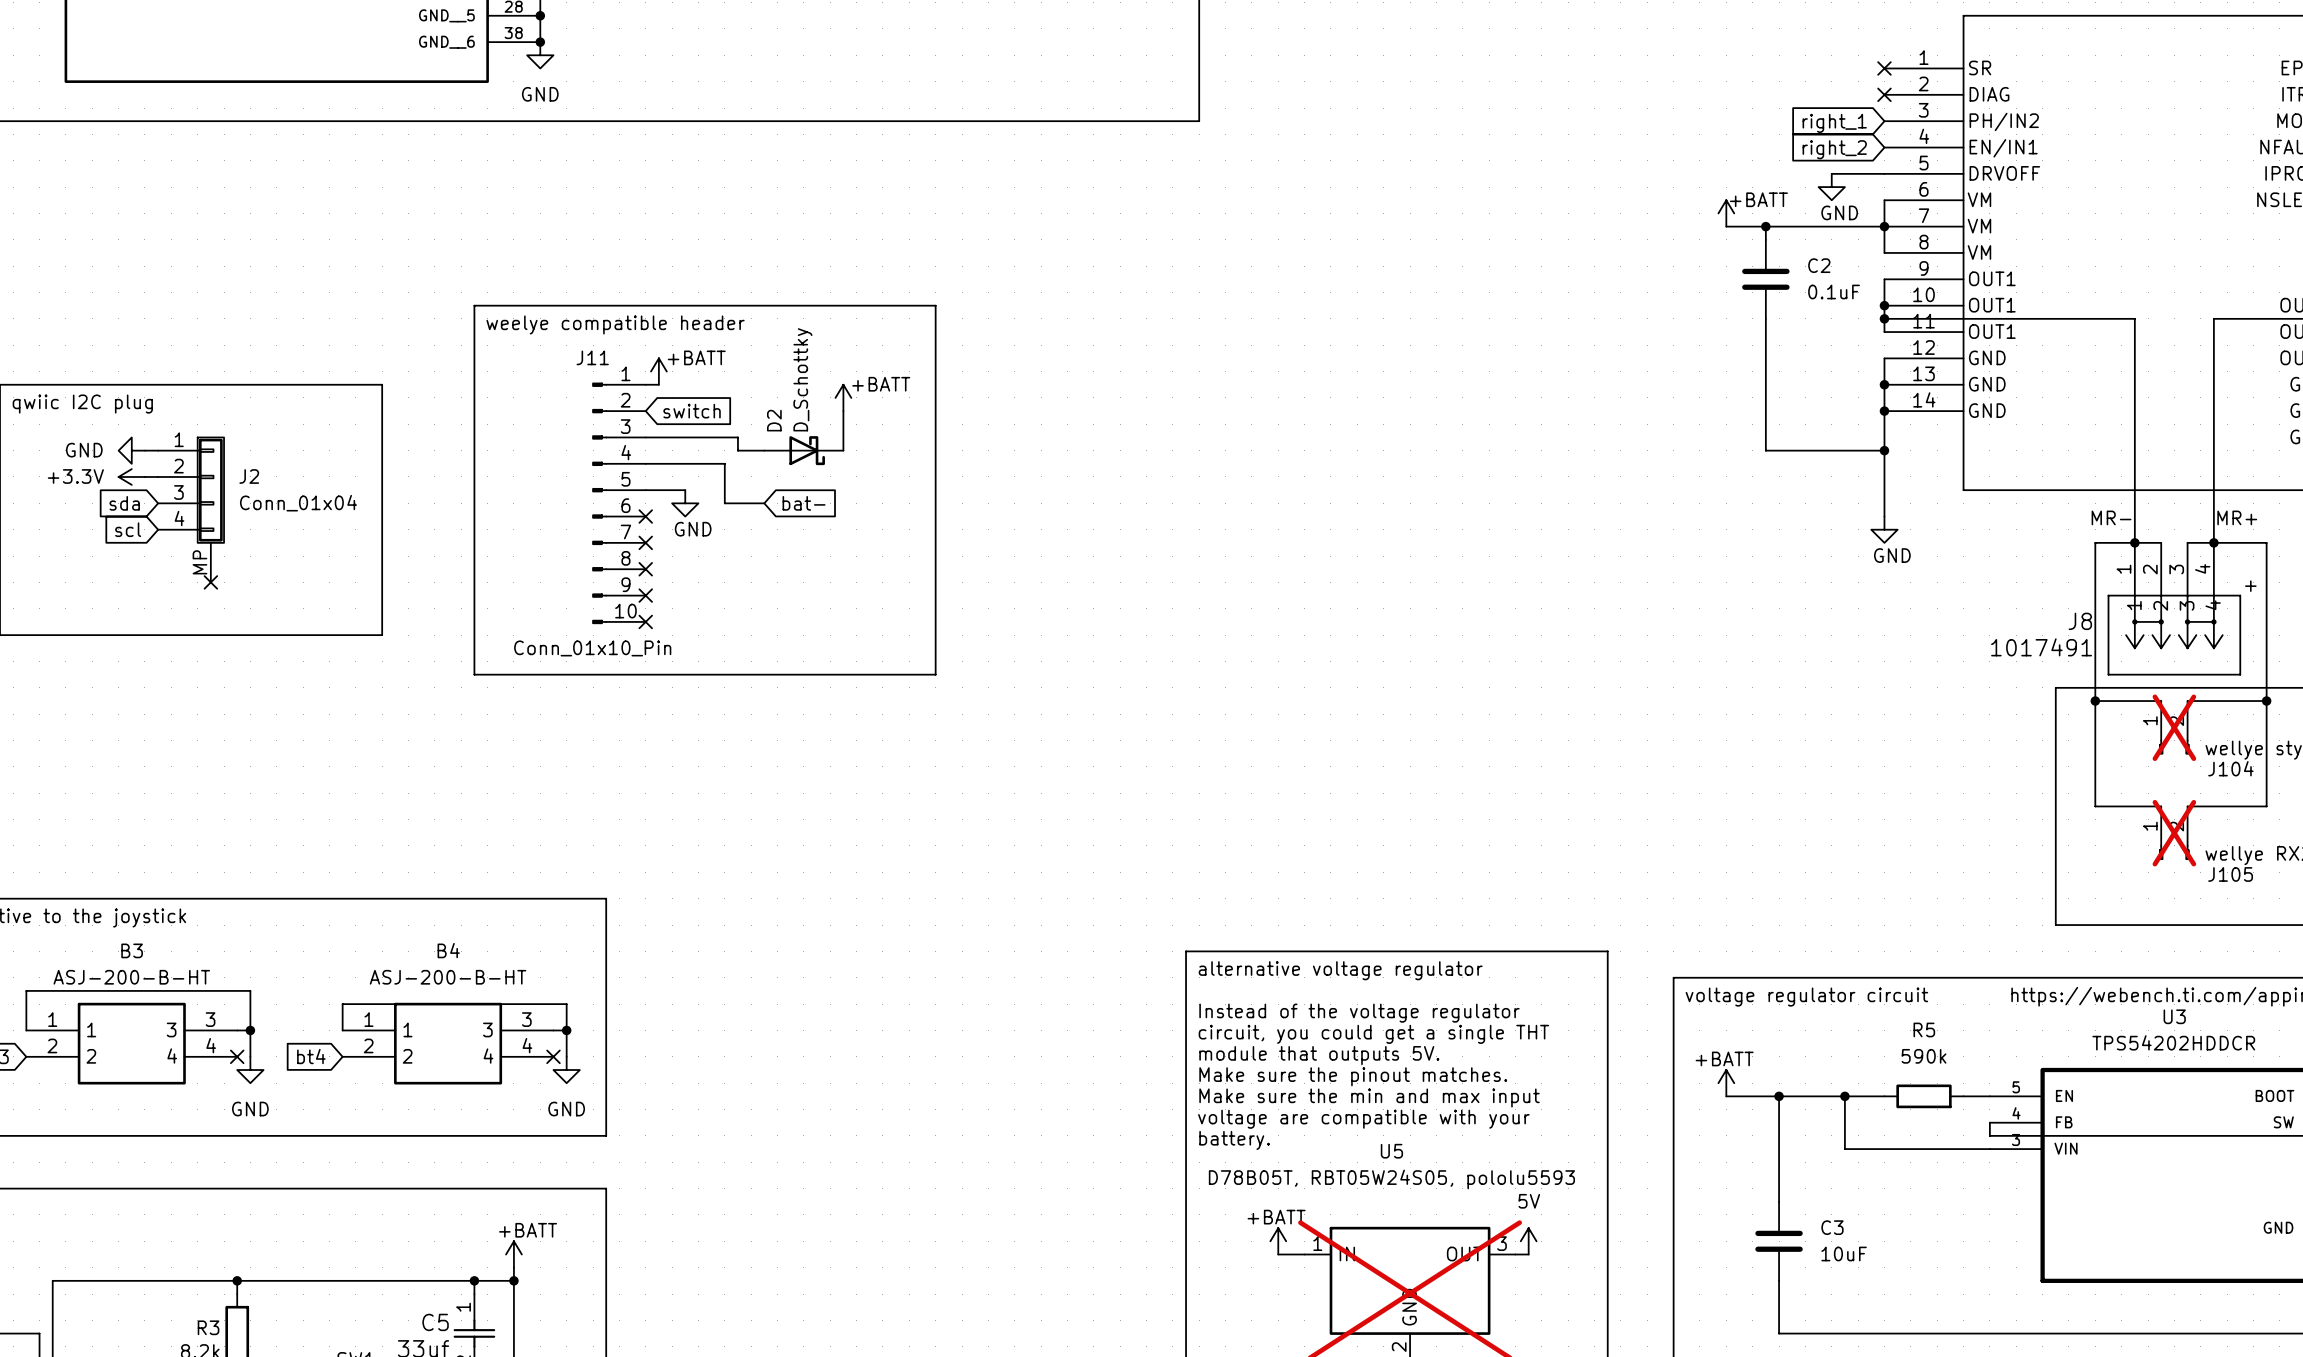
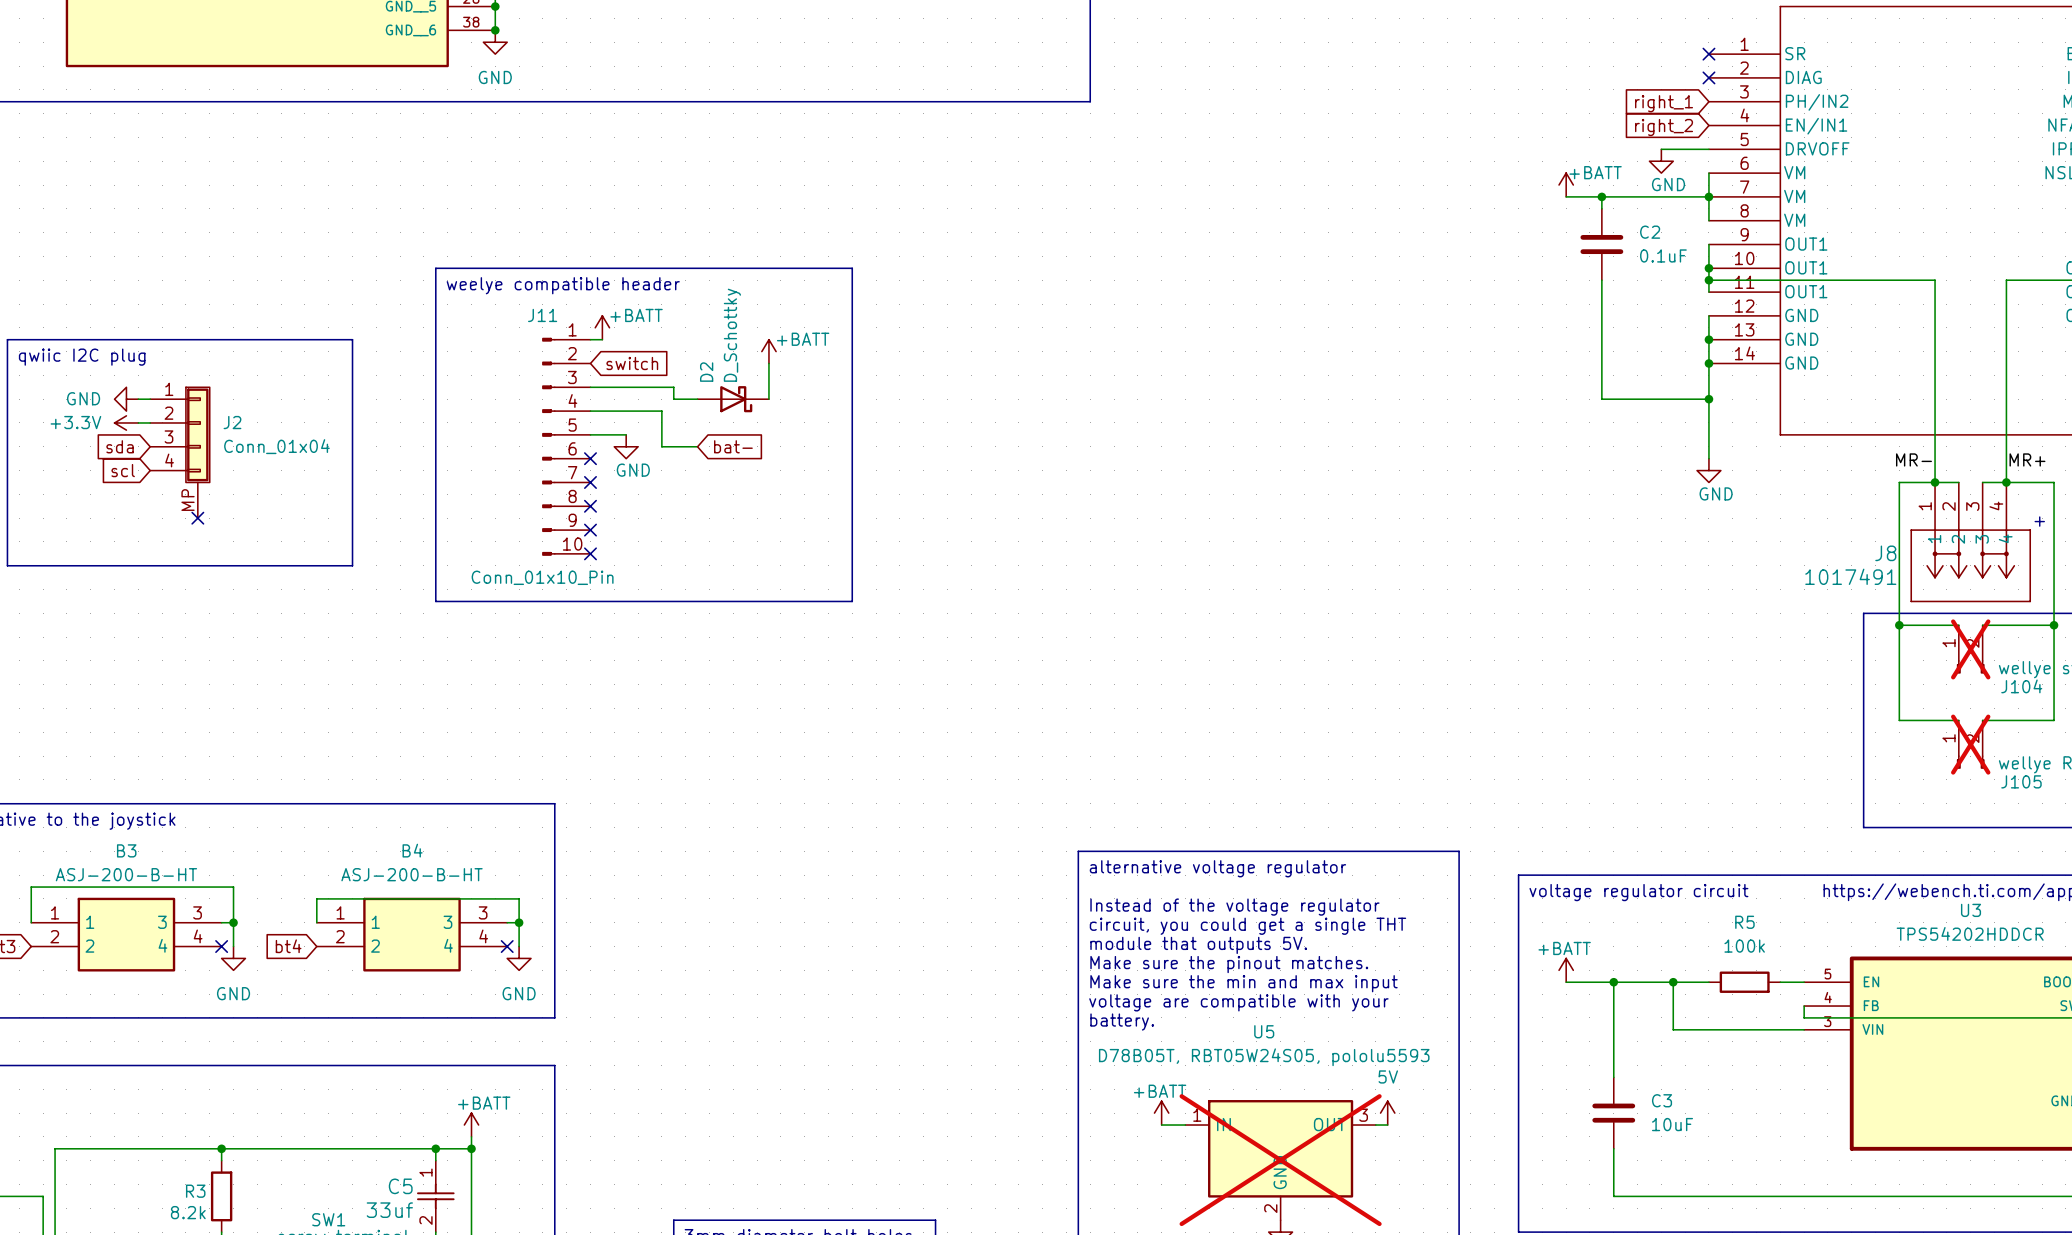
R5 value: 590k (1924, 1056) -> 100k (1744, 946)

